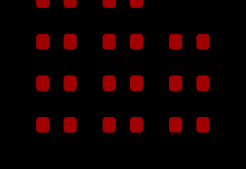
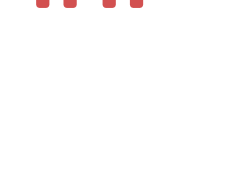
part: (56, 41) -> none
part: (122, 41) -> none
part: (189, 41) -> none
part: (56, 83) -> none
part: (122, 83) -> none
part: (189, 83) -> none
part: (56, 124) -> none
part: (122, 124) -> none
part: (189, 124) -> none

